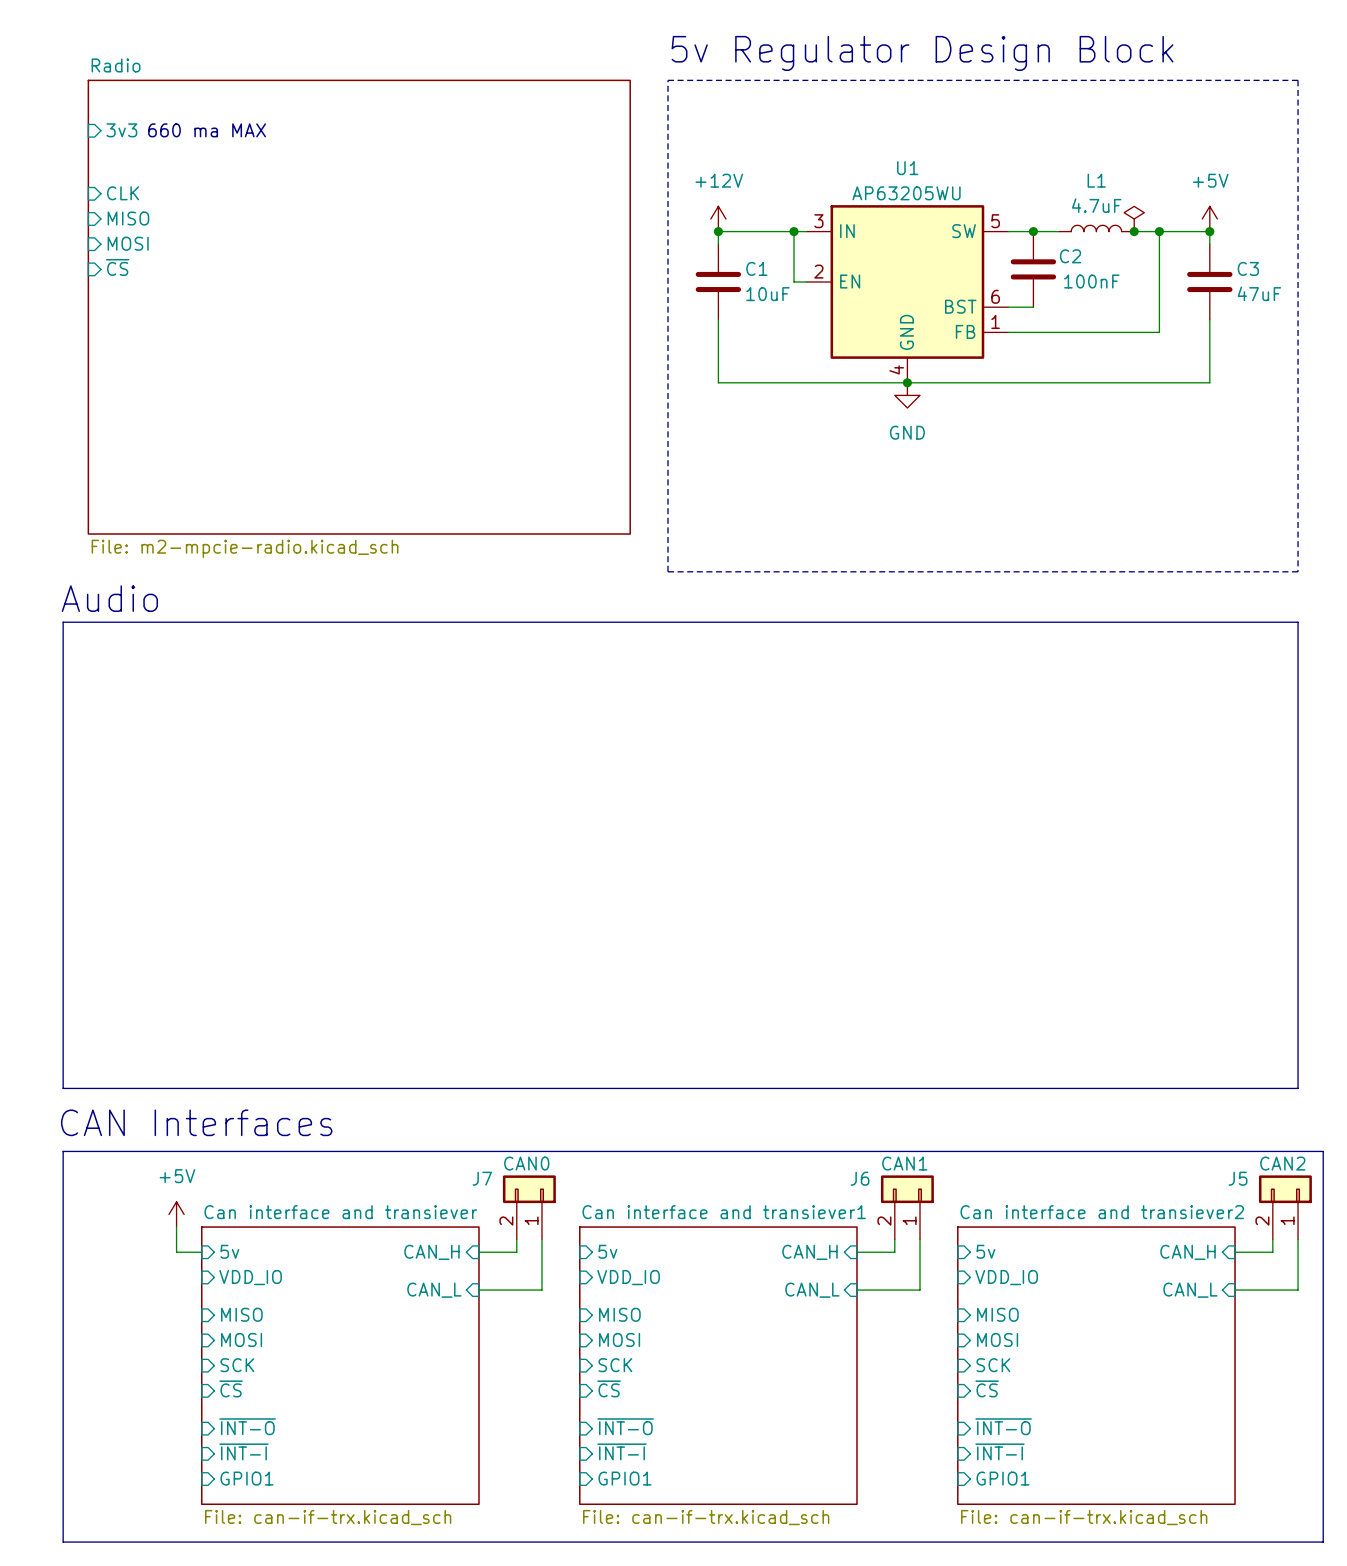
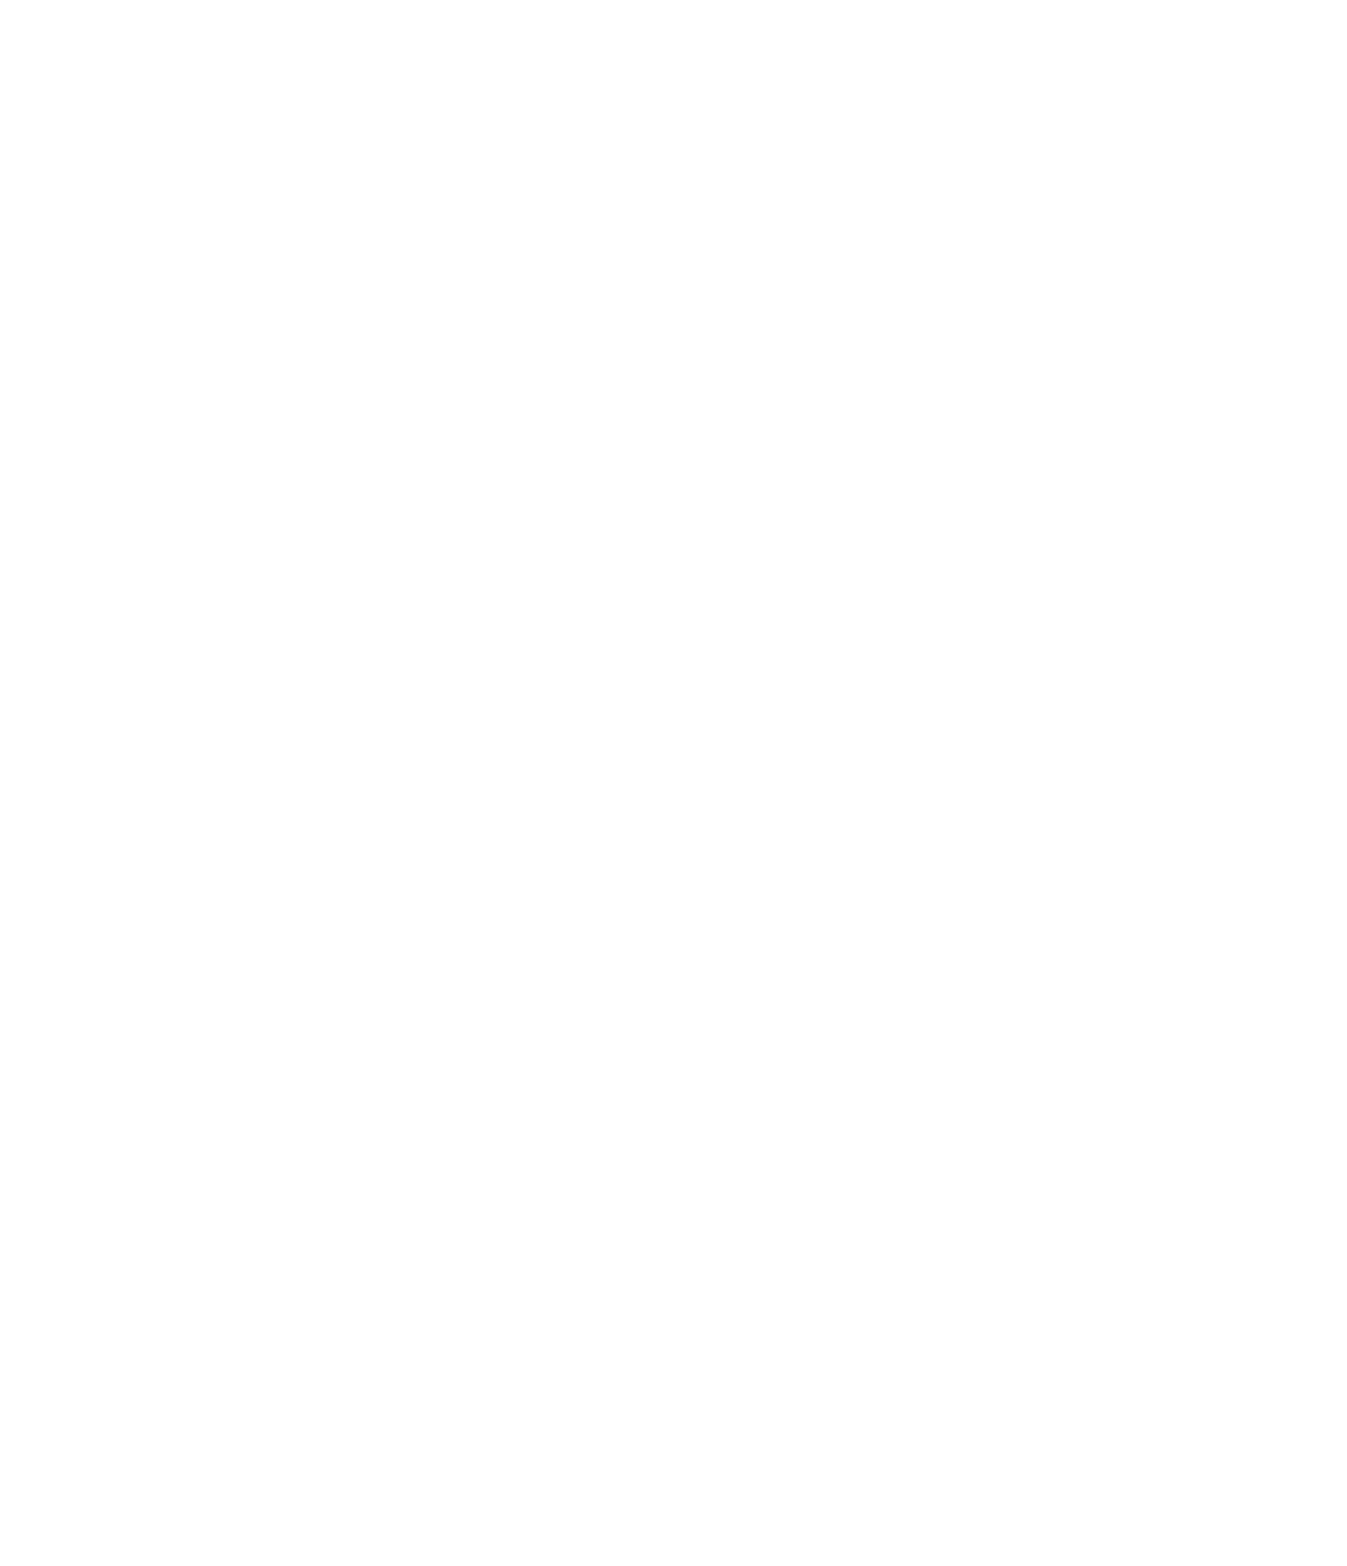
text: 5v Regulator Design Block (922, 53) -> none
line: (667, 80) (1298, 80) (1298, 571) (667, 571) (667, 80) -> none
sheet pin: 3v3 (121, 130) -> none
text: 660 ma MAX (207, 130) -> none
sheet pin: CLK (123, 193) -> none
sheet pin: MISO (128, 218) -> none
power symbol: +12V (718, 218) -> none
power symbol: (1134, 218) -> none
power symbol: +5V (1209, 218) -> none
L1: 4.7uF (1096, 228) -> none
junction: (718, 231) -> none
wire: (793, 231) (793, 281) (806, 281) -> none
junction: (793, 231) -> none
wire: (806, 231) (718, 231) (718, 244) -> none
wire: (1008, 231) (1058, 231) -> none
junction: (1033, 231) -> none
wire: (1134, 231) (1209, 231) (1209, 244) -> none
junction: (1134, 231) -> none
wire: (1159, 231) (1159, 332) (1008, 332) -> none
junction: (1159, 231) -> none
junction: (1209, 231) -> none
sheet pin: MOSI (128, 243) -> none
sheet pin: ~{CS} (117, 267) -> none
C2: 100nF (1033, 269) -> none
C1: 10uF (718, 281) -> none
C3: 47uF (1209, 281) -> none
U1: AP63205WU (907, 293) -> none
sheet Radio: File: m2-mpcie-radio.kicad_sch (359, 307) -> none
wire: (1008, 307) (1033, 307) -> none
wire: (718, 319) (718, 382) (1209, 382) (1209, 319) -> none
junction: (907, 382) -> none
power symbol: GND (907, 395) -> none
text: Audio (109, 598) -> none
line: (63, 622) (1298, 622) (1298, 1088) (63, 1088) (63, 622) -> none
text: CAN Interfaces (196, 1122) -> none
line: (63, 1151) (63, 1542) (1323, 1542) (1323, 1151) (63, 1151) -> none
J7: CAN0 (529, 1207) -> none
J6: CAN1 (907, 1207) -> none
J5: CAN2 (1285, 1207) -> none
power symbol: +5V (176, 1214) -> none
wire: (176, 1227) (176, 1252) (201, 1252) -> none
wire: (516, 1239) (516, 1252) (478, 1252) -> none
wire: (541, 1239) (541, 1290) (478, 1290) -> none
wire: (894, 1239) (894, 1252) (857, 1252) -> none
wire: (920, 1239) (920, 1290) (857, 1290) -> none
wire: (1272, 1239) (1272, 1252) (1235, 1252) -> none
wire: (1298, 1239) (1298, 1290) (1235, 1290) -> none
sheet pin: 5v (229, 1251) -> none
sheet pin: 5v (607, 1251) -> none
sheet pin: 5v (985, 1251) -> none
sheet pin: CAN_H (431, 1252) -> none
sheet pin: CAN_H (810, 1252) -> none
sheet pin: CAN_H (1188, 1252) -> none
sheet pin: VDD_IO (250, 1277) -> none
sheet pin: VDD_IO (628, 1277) -> none
sheet pin: VDD_IO (1006, 1277) -> none
sheet pin: CAN_L (434, 1290) -> none
sheet pin: CAN_L (812, 1290) -> none
sheet pin: CAN_L (1190, 1290) -> none
sheet pin: MISO (241, 1314) -> none
sheet pin: MISO (619, 1314) -> none
sheet pin: MISO (997, 1314) -> none
sheet pin: MOSI (241, 1339) -> none
sheet pin: MOSI (619, 1339) -> none
sheet pin: MOSI (997, 1339) -> none
sheet pin: SCK (237, 1365) -> none
sheet Can interface and transiever: File: can-if-trx.kicad_sch (340, 1365) -> none
sheet pin: SCK (615, 1365) -> none
sheet Can interface and transiever1: File: can-if-trx.kicad_sch (718, 1365) -> none
sheet pin: SCK (993, 1365) -> none
sheet Can interface and transiever2: File: can-if-trx.kicad_sch (1096, 1365) -> none
sheet pin: ~{CS} (231, 1388) -> none
sheet pin: ~{CS} (609, 1388) -> none
sheet pin: ~{CS} (987, 1388) -> none
sheet pin: ~{INT-O} (247, 1426) -> none
sheet pin: ~{INT-O} (625, 1426) -> none
sheet pin: ~{INT-O} (1003, 1426) -> none
sheet pin: ~{INT-I} (243, 1451) -> none
sheet pin: ~{INT-I} (621, 1451) -> none
sheet pin: ~{INT-I} (1000, 1451) -> none
sheet pin: GPIO1 (246, 1478) -> none
sheet pin: GPIO1 (624, 1478) -> none
sheet pin: GPIO1 (1003, 1478) -> none

